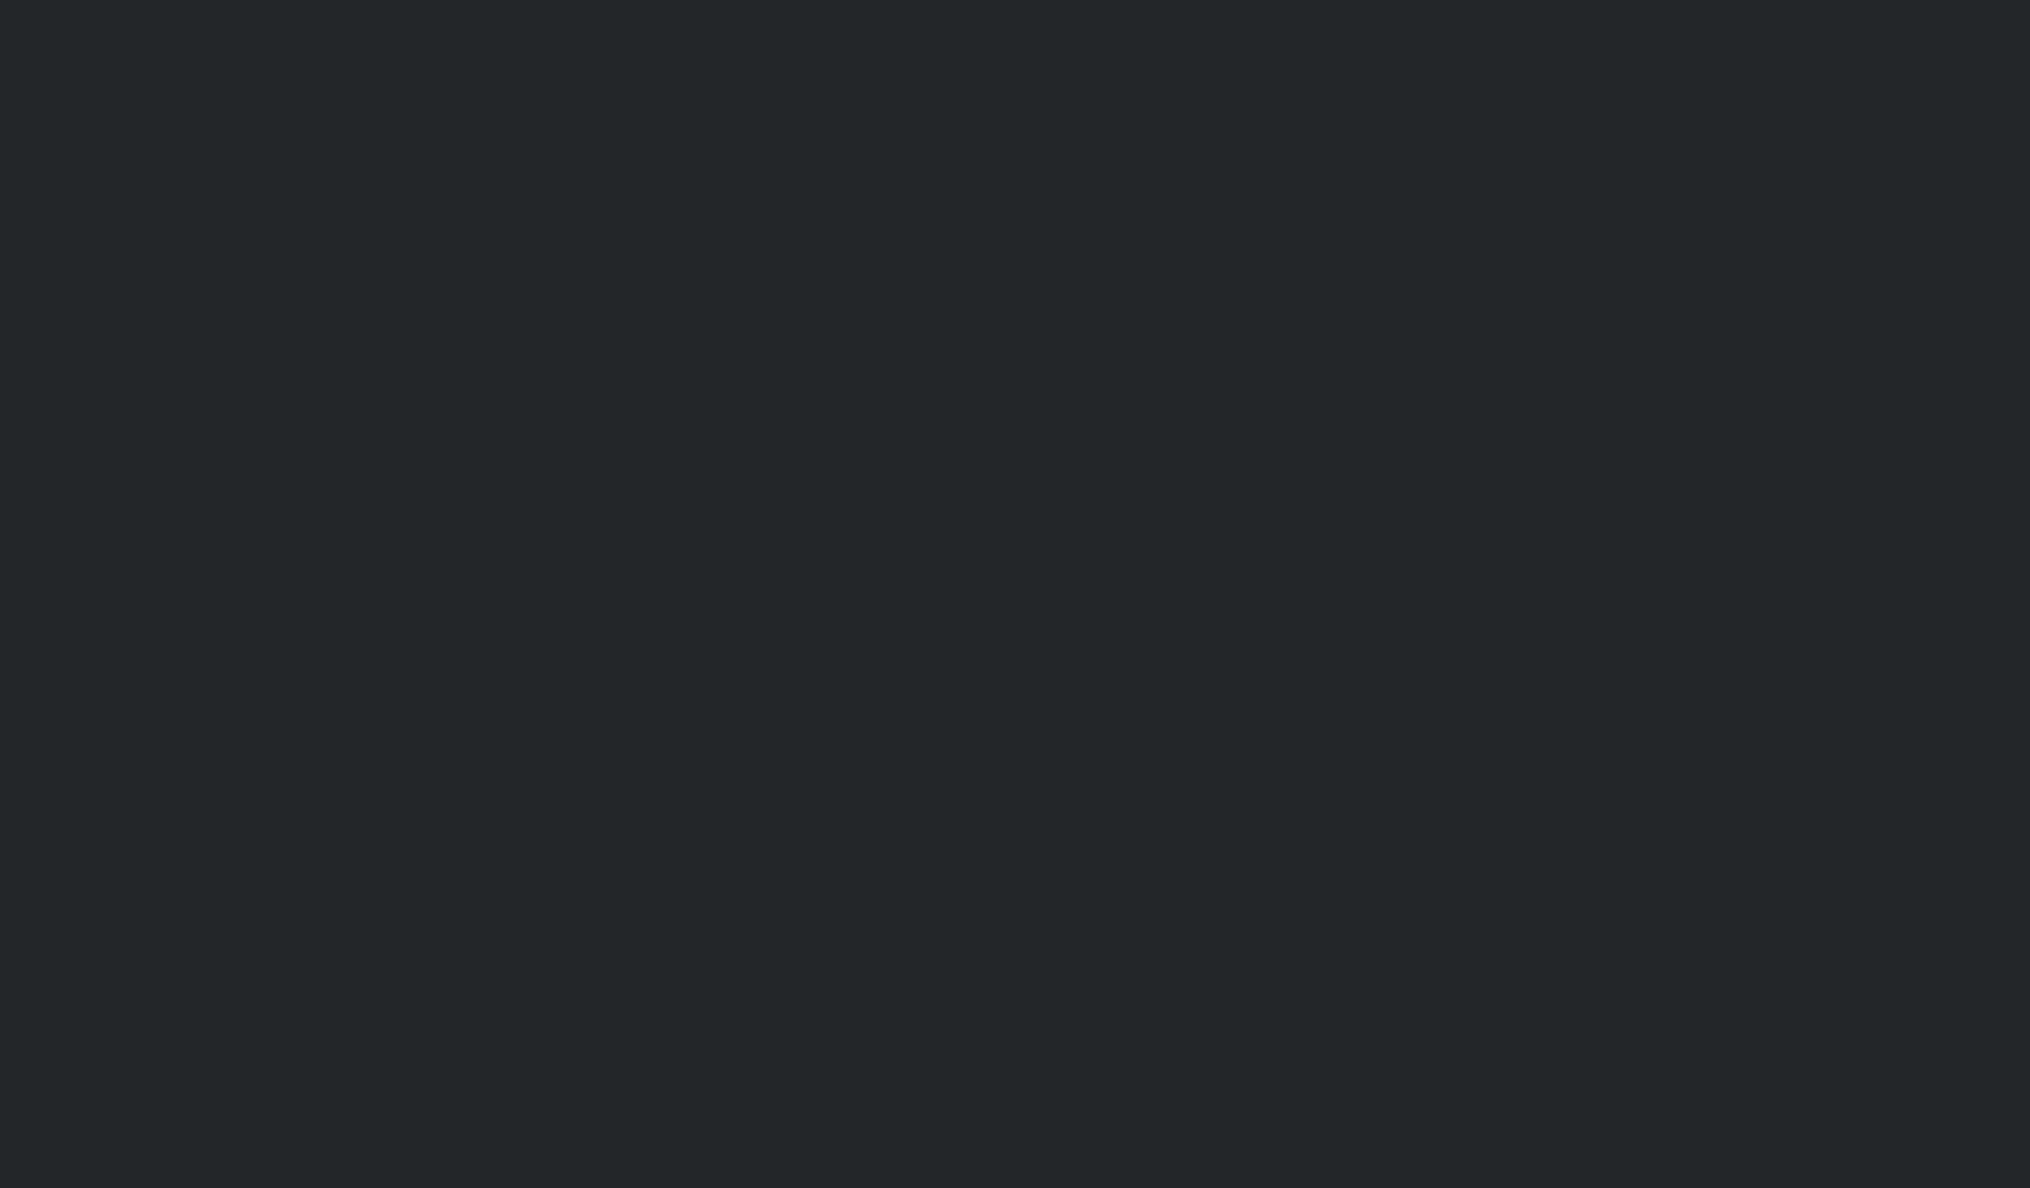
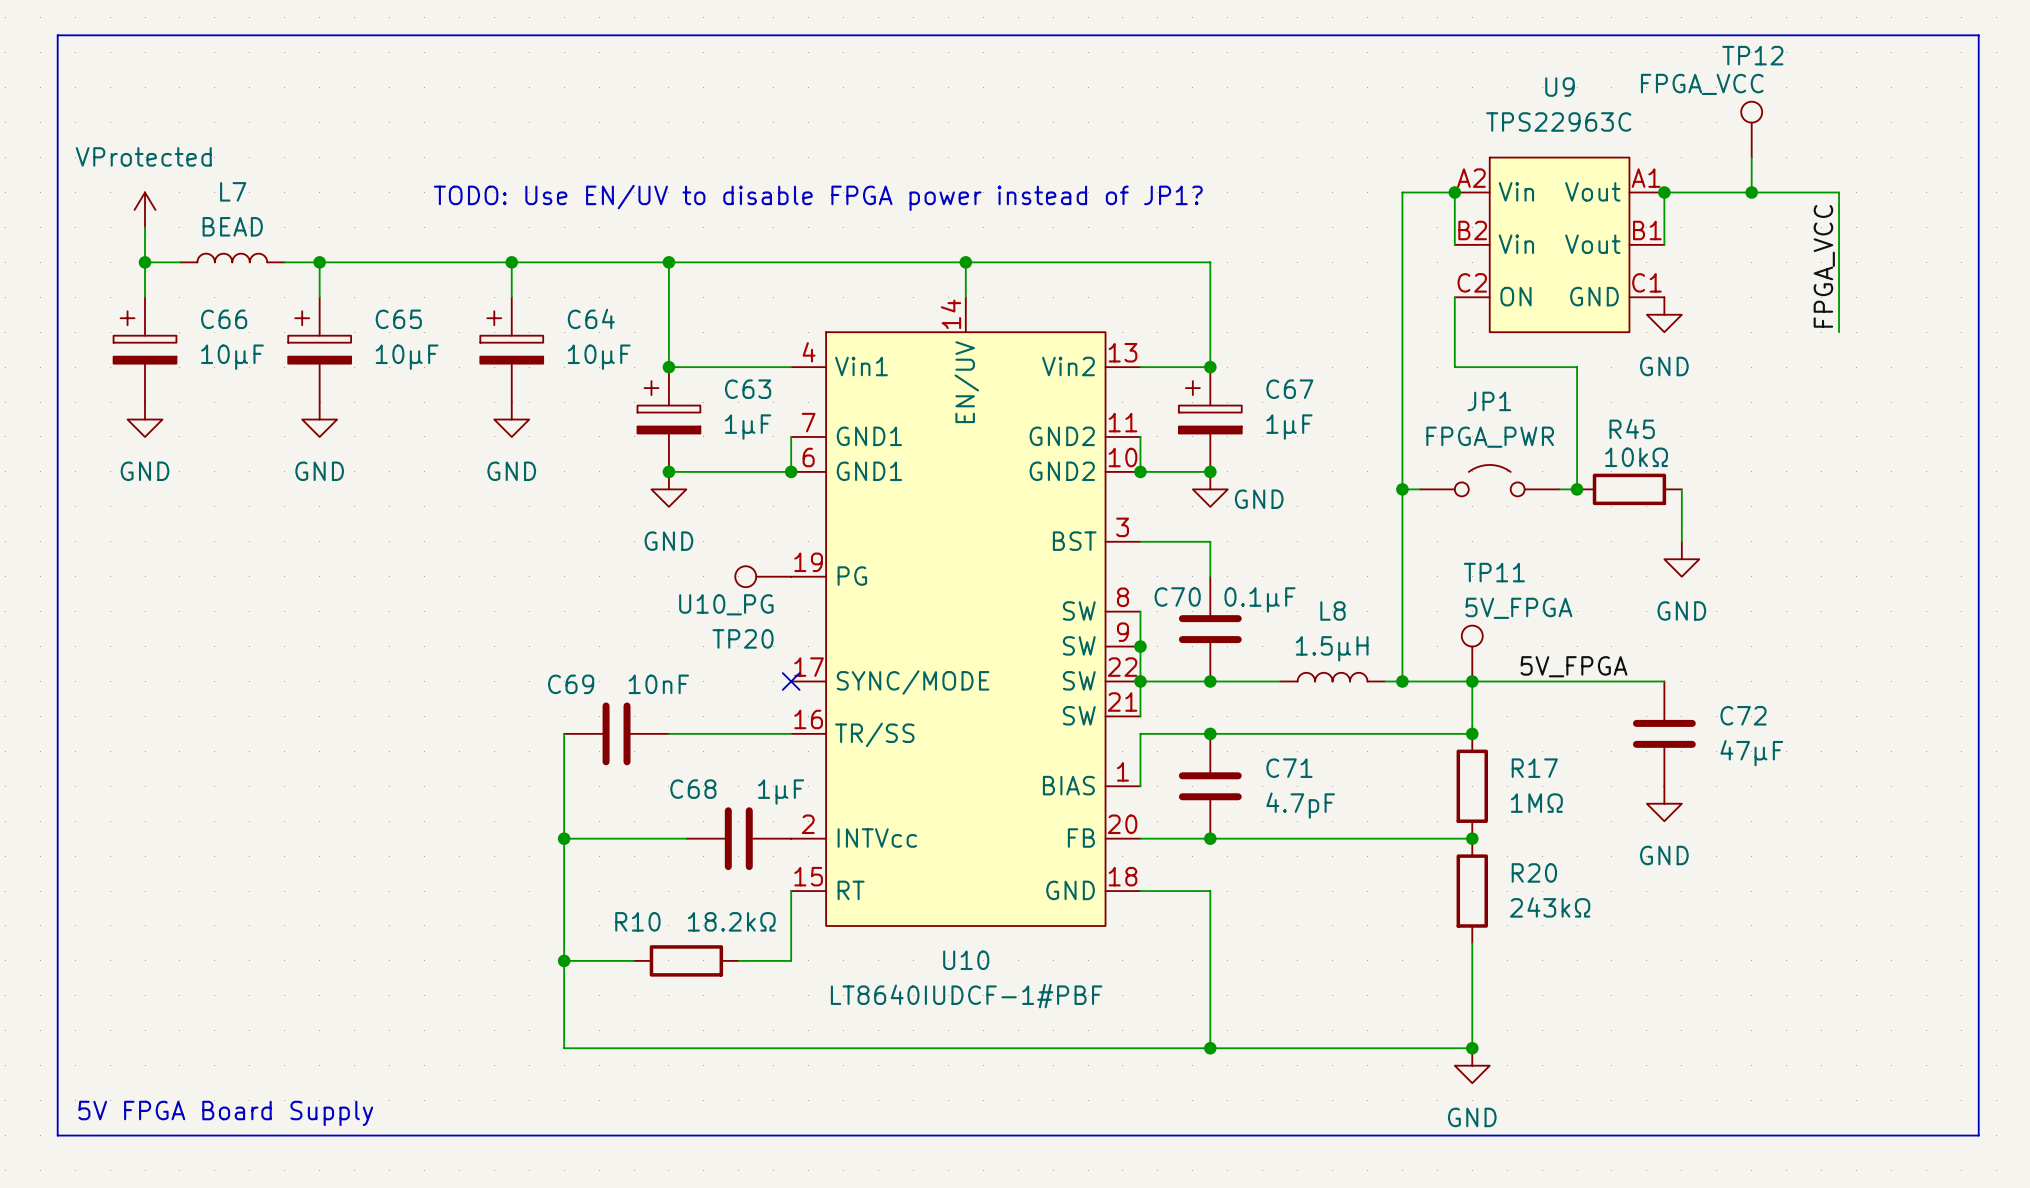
line: none -> (57, 35) (1978, 35) (1978, 1135) (57, 1135) (57, 35)
TP12: none -> FPGA_VCC (1751, 129)
wire: none -> (1751, 157) (1751, 192)
junction: none -> (1454, 192)
junction: none -> (1664, 192)
junction: none -> (1751, 192)
text: none -> TODO: Use EN/UV to disable FPGA power instead of JP1? (818, 197)
power symbol: none -> VProtected (145, 209)
wire: none -> (145, 227) (145, 297)
wire: none -> (1454, 244) (1454, 192) (1402, 192) (1402, 681)
U9: none -> TPS22963C (1559, 244)
wire: none -> (1664, 244) (1664, 192) (1839, 192) (1839, 332)
L7: none -> BEAD (232, 258)
wire: none -> (145, 262) (179, 262)
junction: none -> (145, 262)
wire: none -> (284, 262) (1210, 262) (1210, 367) (1140, 367)
wire: none -> (319, 262) (319, 297)
junction: none -> (319, 262)
wire: none -> (511, 262) (511, 297)
junction: none -> (511, 262)
wire: none -> (668, 262) (668, 367) (791, 367)
junction: none -> (668, 262)
wire: none -> (965, 262) (965, 297)
junction: none -> (965, 262)
label: none -> FPGA_VCC (1824, 266)
wire: none -> (1454, 297) (1454, 367) (1577, 367) (1577, 489) (1559, 489)
power symbol: none -> GND (1664, 314)
C66: none -> 10µF (145, 349)
C65: none -> 10µF (319, 349)
C64: none -> 10µF (511, 349)
junction: none -> (668, 367)
junction: none -> (1210, 367)
power symbol: none -> GND (145, 419)
power symbol: none -> GND (319, 419)
power symbol: none -> GND (511, 419)
C63: none -> 1µF (668, 419)
C67: none -> 1µF (1210, 419)
wire: none -> (791, 436) (791, 471) (668, 471)
wire: none -> (1140, 436) (1140, 471) (1210, 471)
junction: none -> (668, 471)
junction: none -> (791, 471)
junction: none -> (1140, 471)
junction: none -> (1210, 471)
JP1: none -> FPGA_PWR (1489, 480)
power symbol: none -> GND (668, 489)
power symbol: none -> GND (1210, 489)
wire: none -> (1402, 489) (1419, 489)
junction: none -> (1402, 489)
junction: none -> (1577, 489)
R45: none -> 10kΩ (1629, 489)
wire: none -> (1681, 489) (1681, 541)
wire: none -> (1140, 541) (1210, 541) (1210, 576)
power symbol: none -> GND (1681, 559)
TP20: none -> U10_PG (763, 576)
U10: none -> LT8640IUDCF-1#PBF (965, 611)
wire: none -> (1140, 611) (1140, 716)
C70: none -> 0.1µF (1210, 629)
junction: none -> (1140, 646)
TP11: none -> 5V_FPGA (1472, 653)
label: none -> 5V_FPGA (1574, 666)
L8: none -> 1.5µH (1332, 677)
no-connect mark: none -> (791, 681)
wire: none -> (1140, 681) (1280, 681)
junction: none -> (1140, 681)
junction: none -> (1210, 681)
wire: none -> (1384, 681) (1664, 681)
junction: none -> (1402, 681)
wire: none -> (1472, 681) (1472, 733) (1140, 733) (1140, 786)
junction: none -> (1472, 681)
wire: none -> (564, 733) (564, 1048) (1472, 1048) (1472, 943)
C69: none -> 10nF (616, 733)
wire: none -> (668, 733) (791, 733)
junction: none -> (1210, 733)
junction: none -> (1472, 733)
C72: none -> 47µF (1664, 733)
C71: none -> 4.7pF (1210, 786)
R17: none -> 1MΩ (1472, 786)
power symbol: none -> GND (1664, 803)
wire: none -> (564, 838) (686, 838)
junction: none -> (564, 838)
C68: none -> 1µF (738, 838)
wire: none -> (1140, 838) (1472, 838)
junction: none -> (1210, 838)
junction: none -> (1472, 838)
wire: none -> (791, 891) (791, 960) (738, 960)
wire: none -> (1140, 891) (1210, 891) (1210, 1048)
R20: none -> 243kΩ (1472, 891)
wire: none -> (564, 960) (634, 960)
junction: none -> (564, 960)
R10: none -> 18.2kΩ (686, 960)
junction: none -> (1210, 1048)
junction: none -> (1472, 1048)
power symbol: none -> GND (1472, 1065)
text: none -> 5V FPGA Board Supply (225, 1113)

